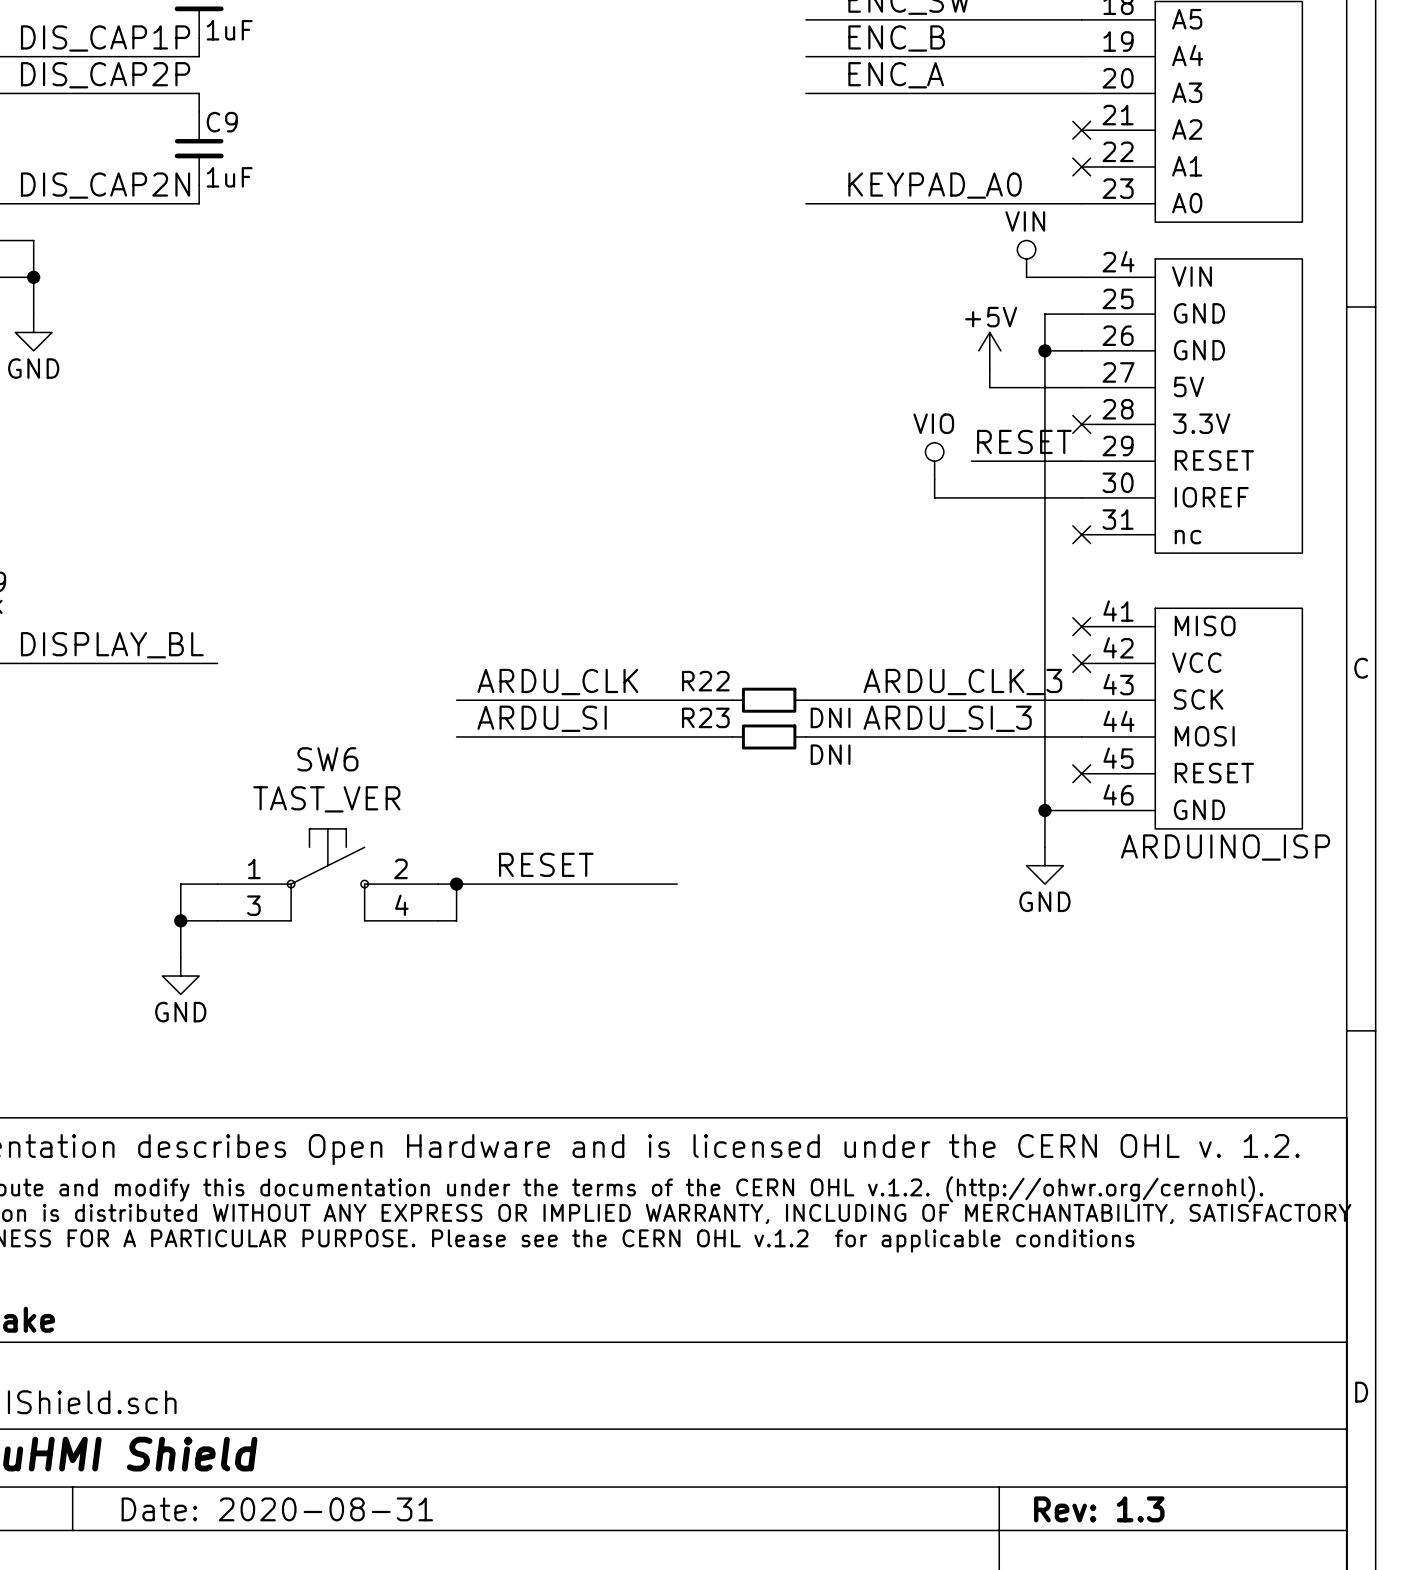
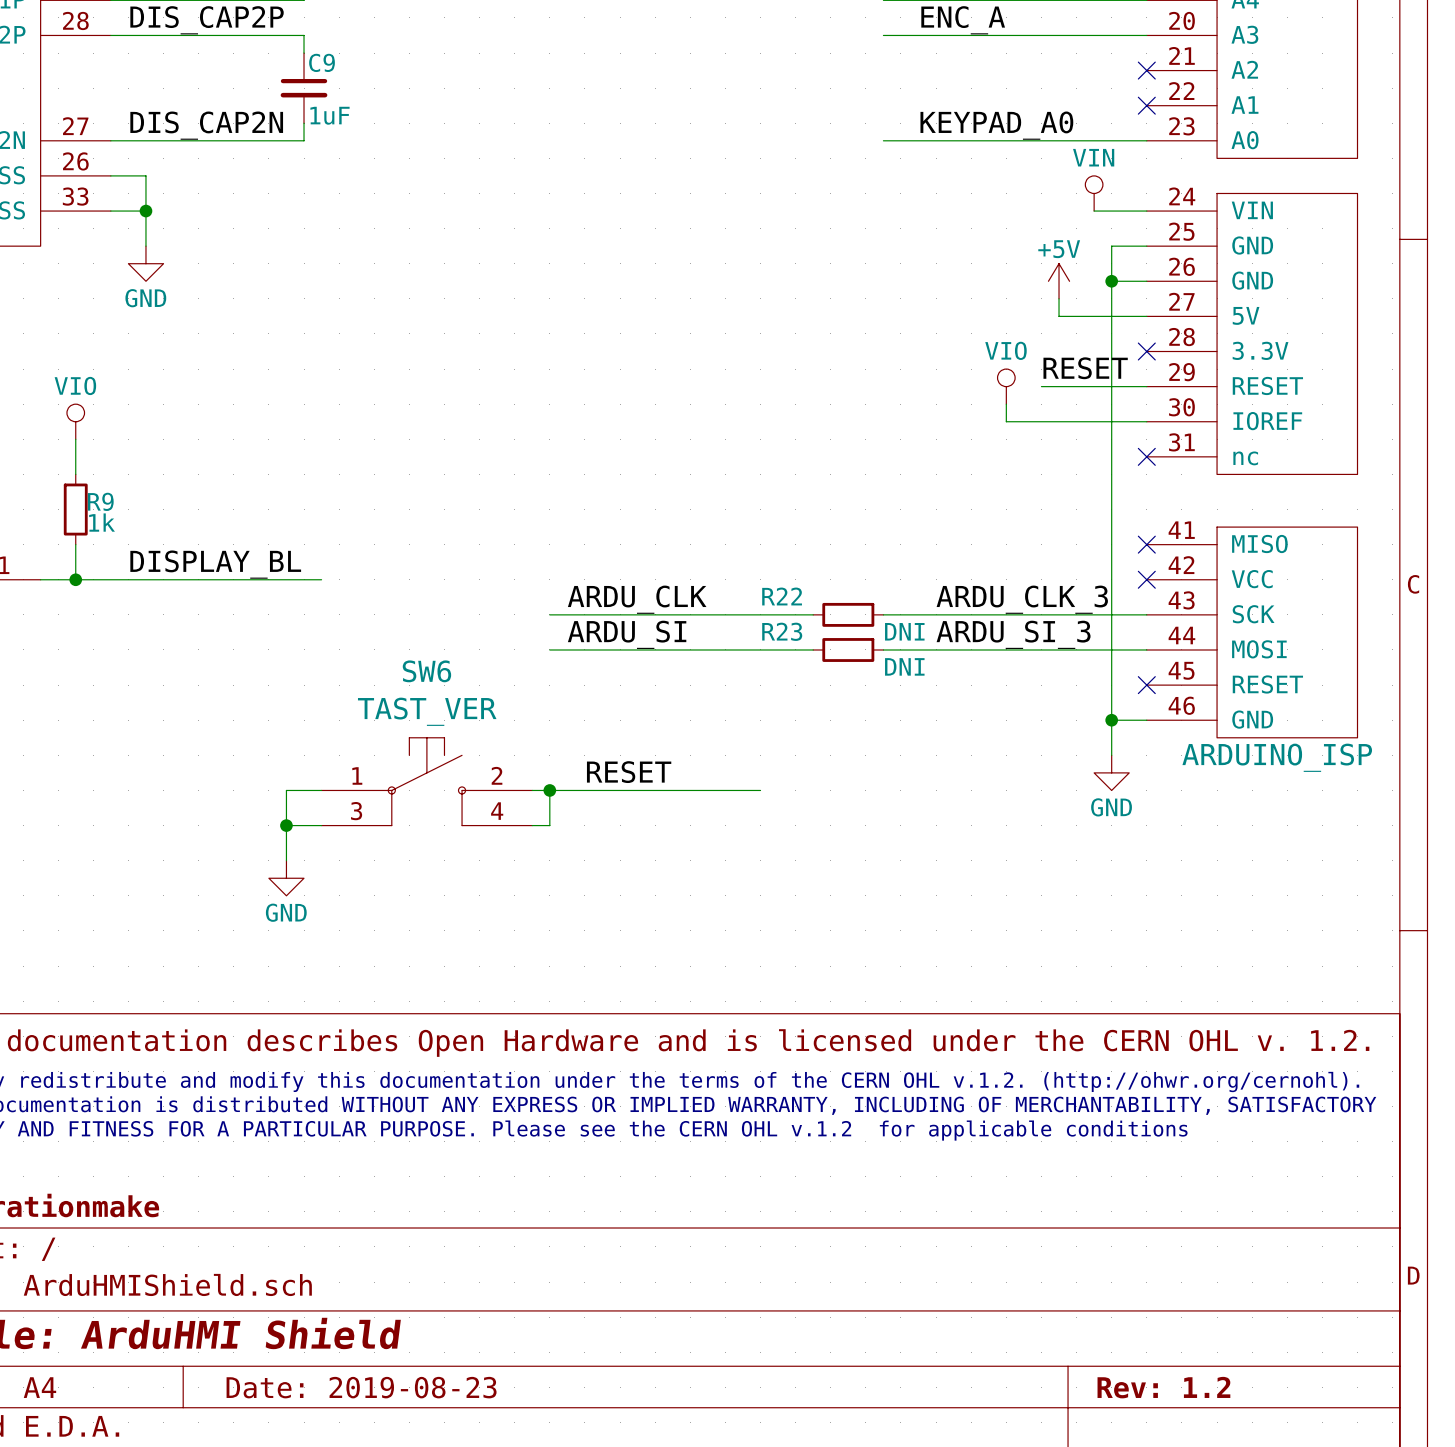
title block: Date: 2020-08-31 (277, 1509) -> Date: 2019-08-23 (361, 1387)
title block: Rev: 1.3 (1099, 1509) -> Rev: 1.2 (1163, 1387)

